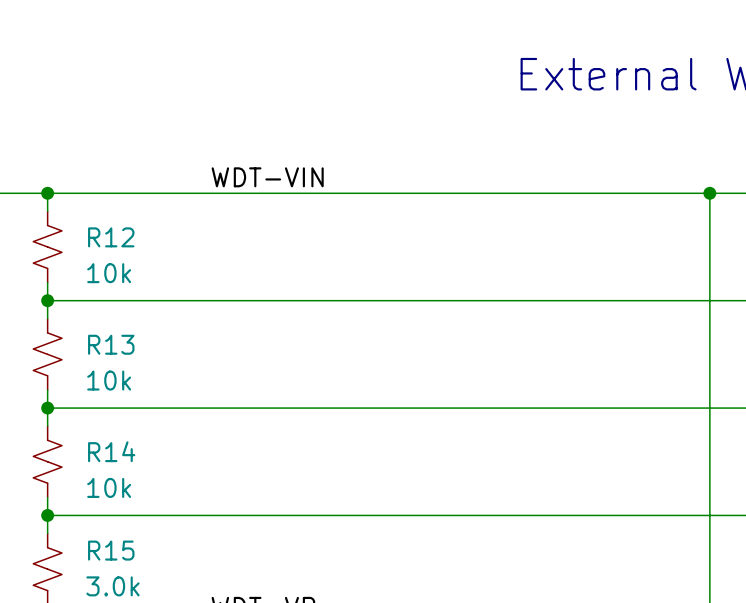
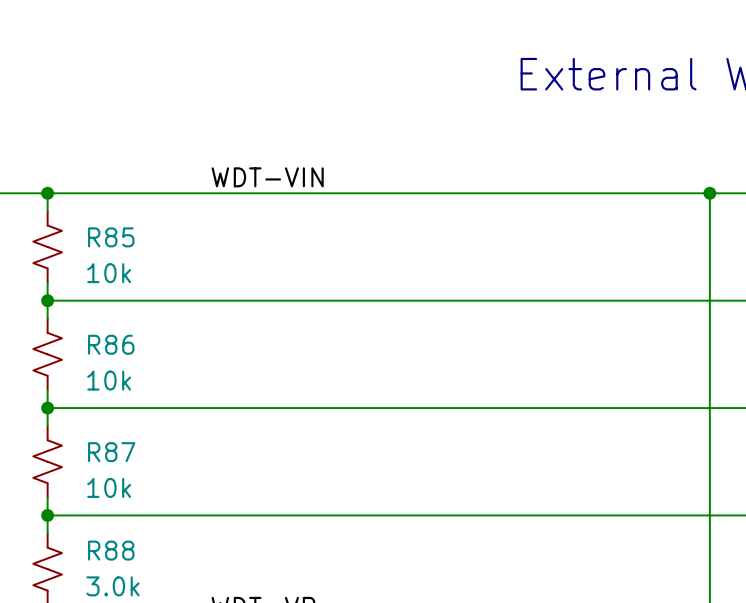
R12 name: R12 (111, 237) -> R85 (111, 237)
R13 name: R13 (111, 344) -> R86 (111, 344)
R14 name: R14 (111, 451) -> R87 (111, 452)
R15 name: R15 (111, 550) -> R88 (111, 550)

